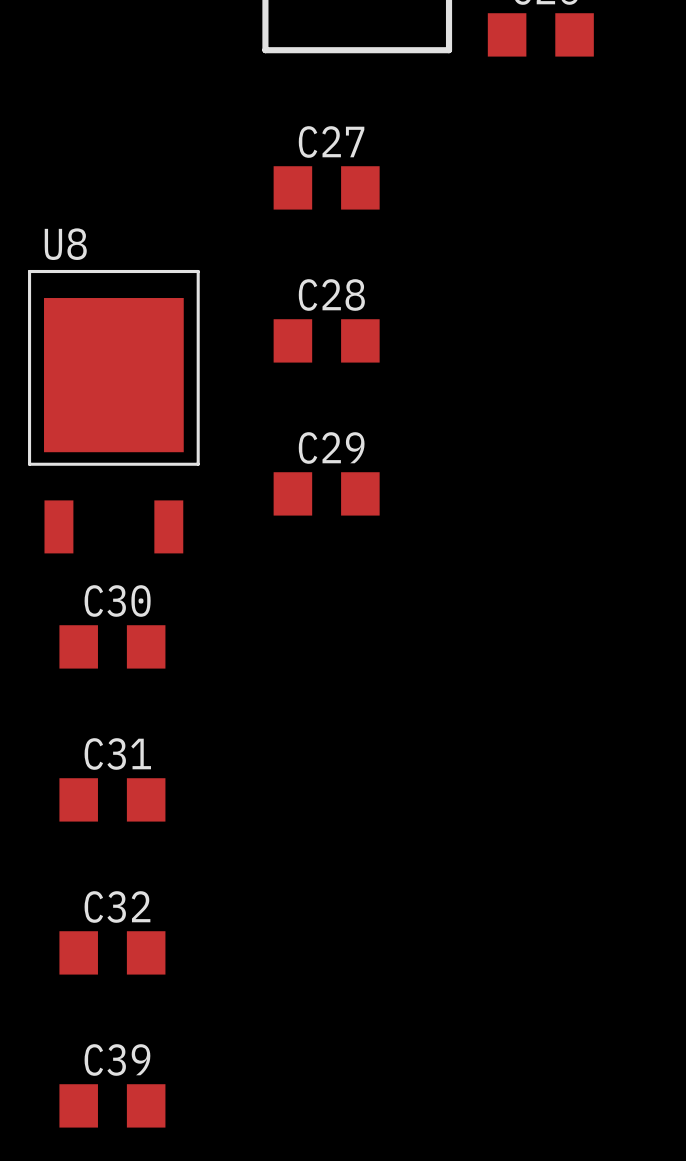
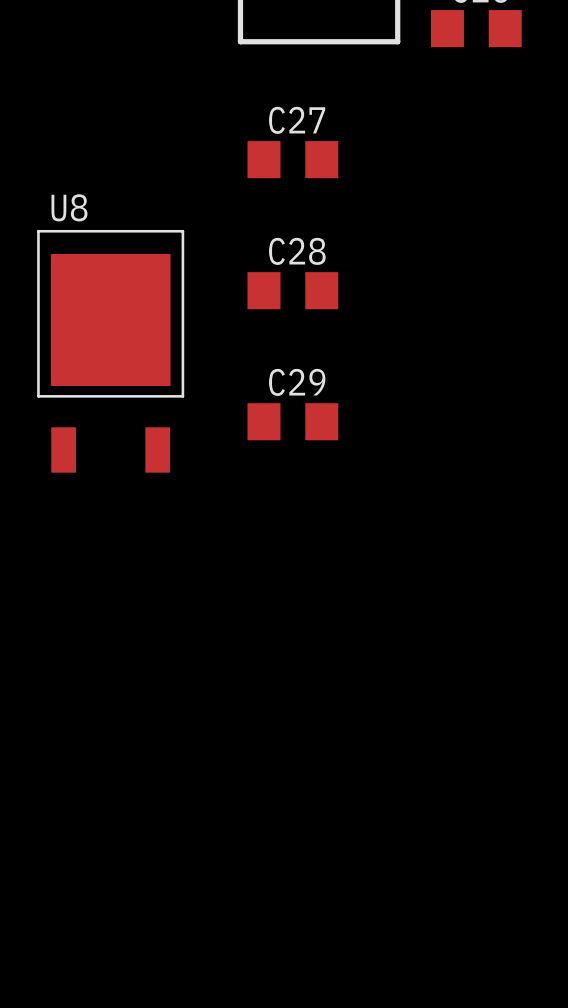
C30: (112, 646) -> none
C31: (112, 799) -> none
C32: (112, 952) -> none
C39: (112, 1105) -> none

